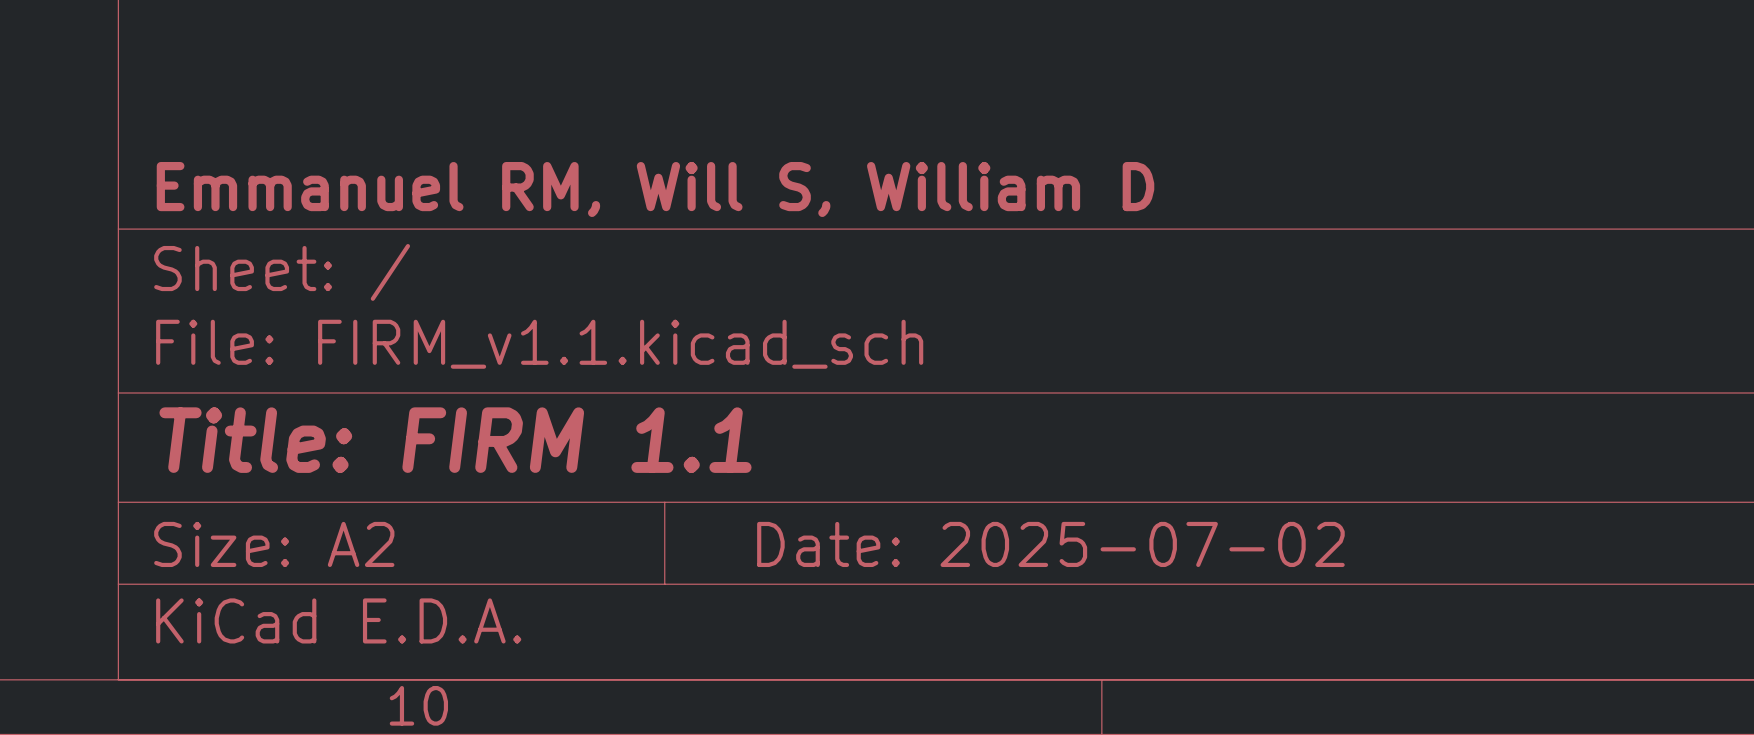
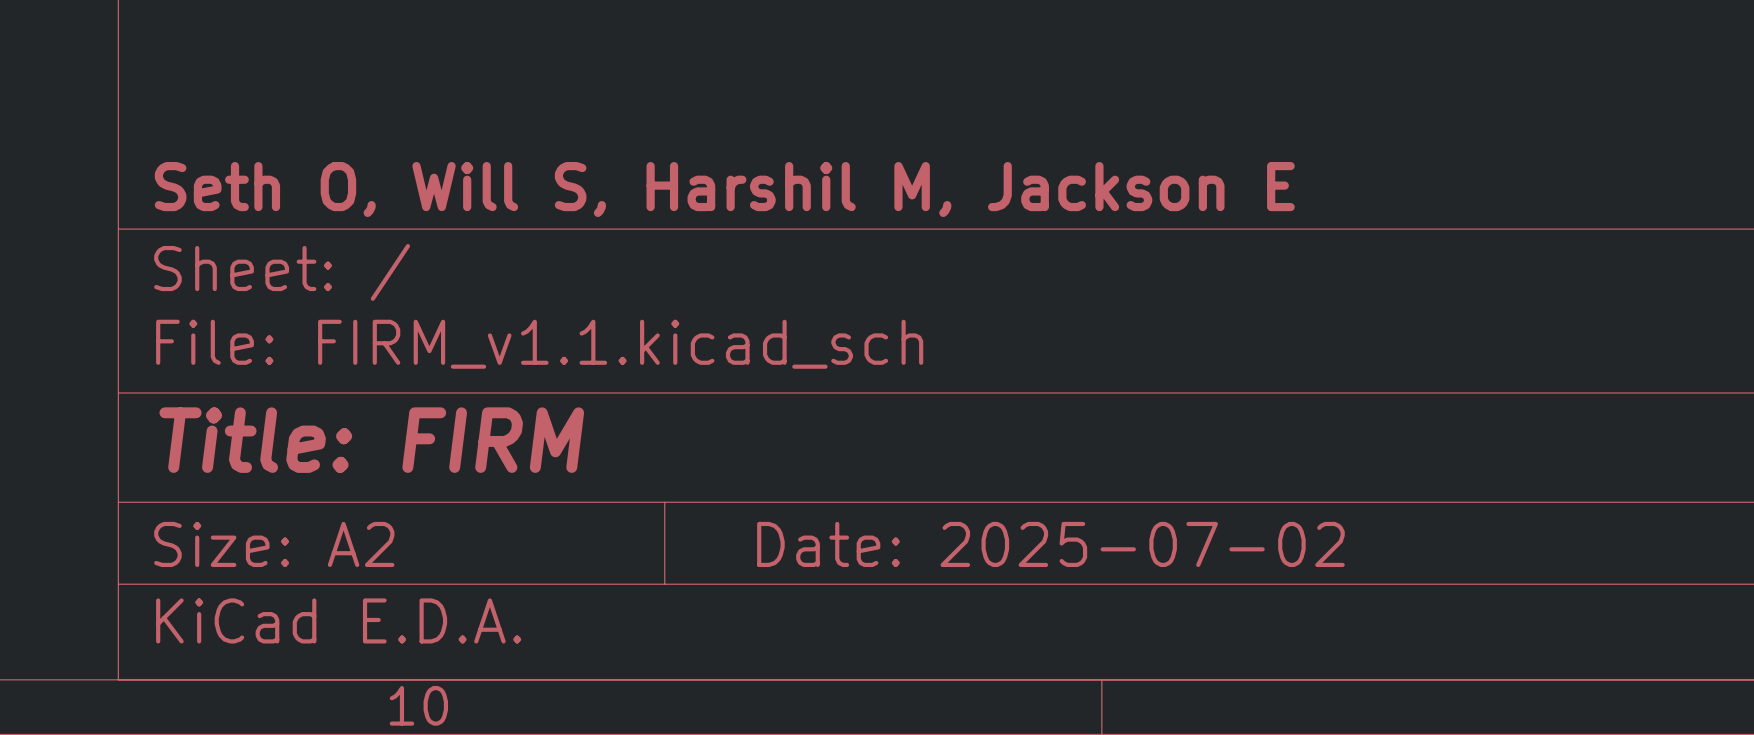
title block: Emmanuel RM, Will S, William D (655, 189) -> Seth O, Will S, Harshil M, Jackson E (724, 189)
title block: Title: FIRM 1.1 (455, 440) -> Title: FIRM (371, 440)

